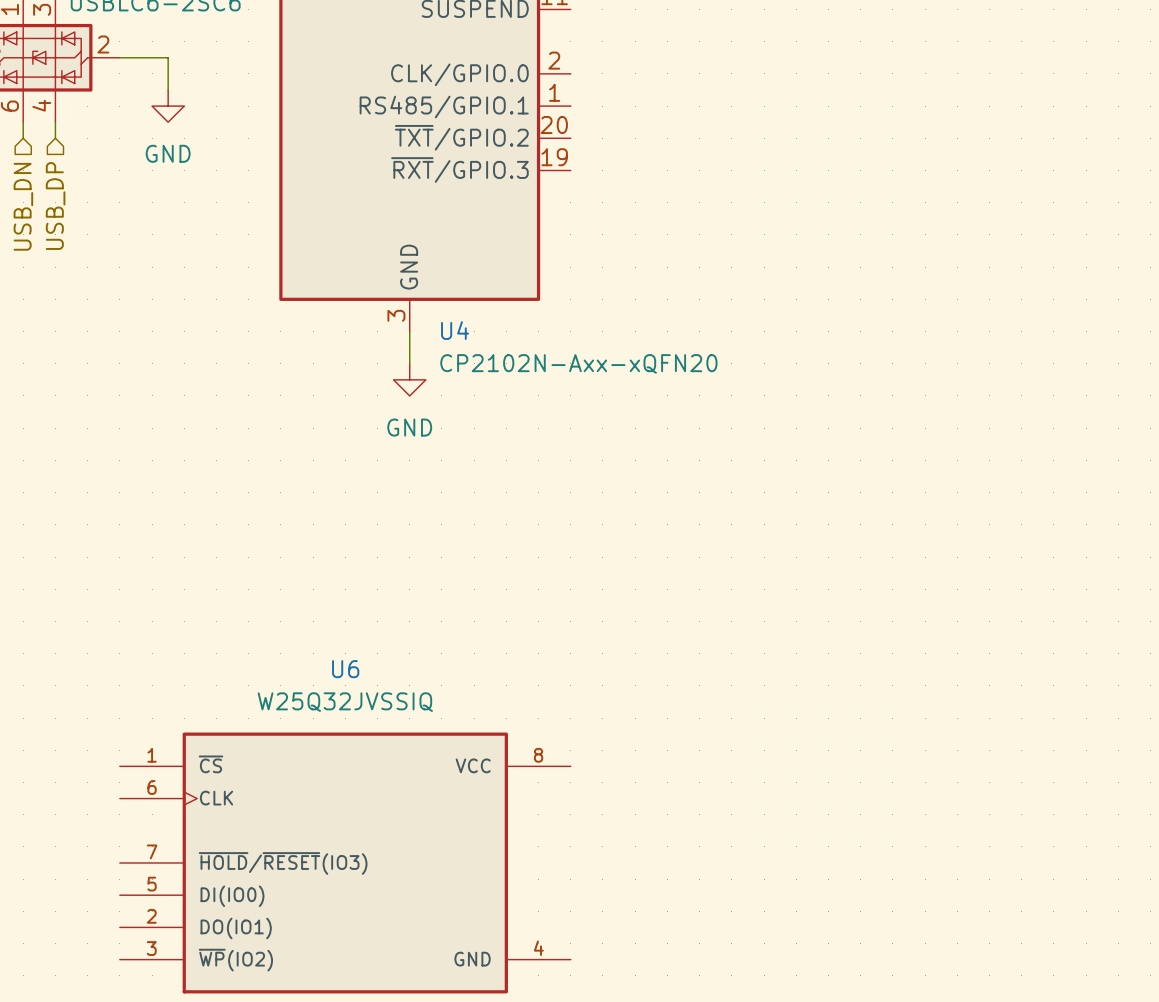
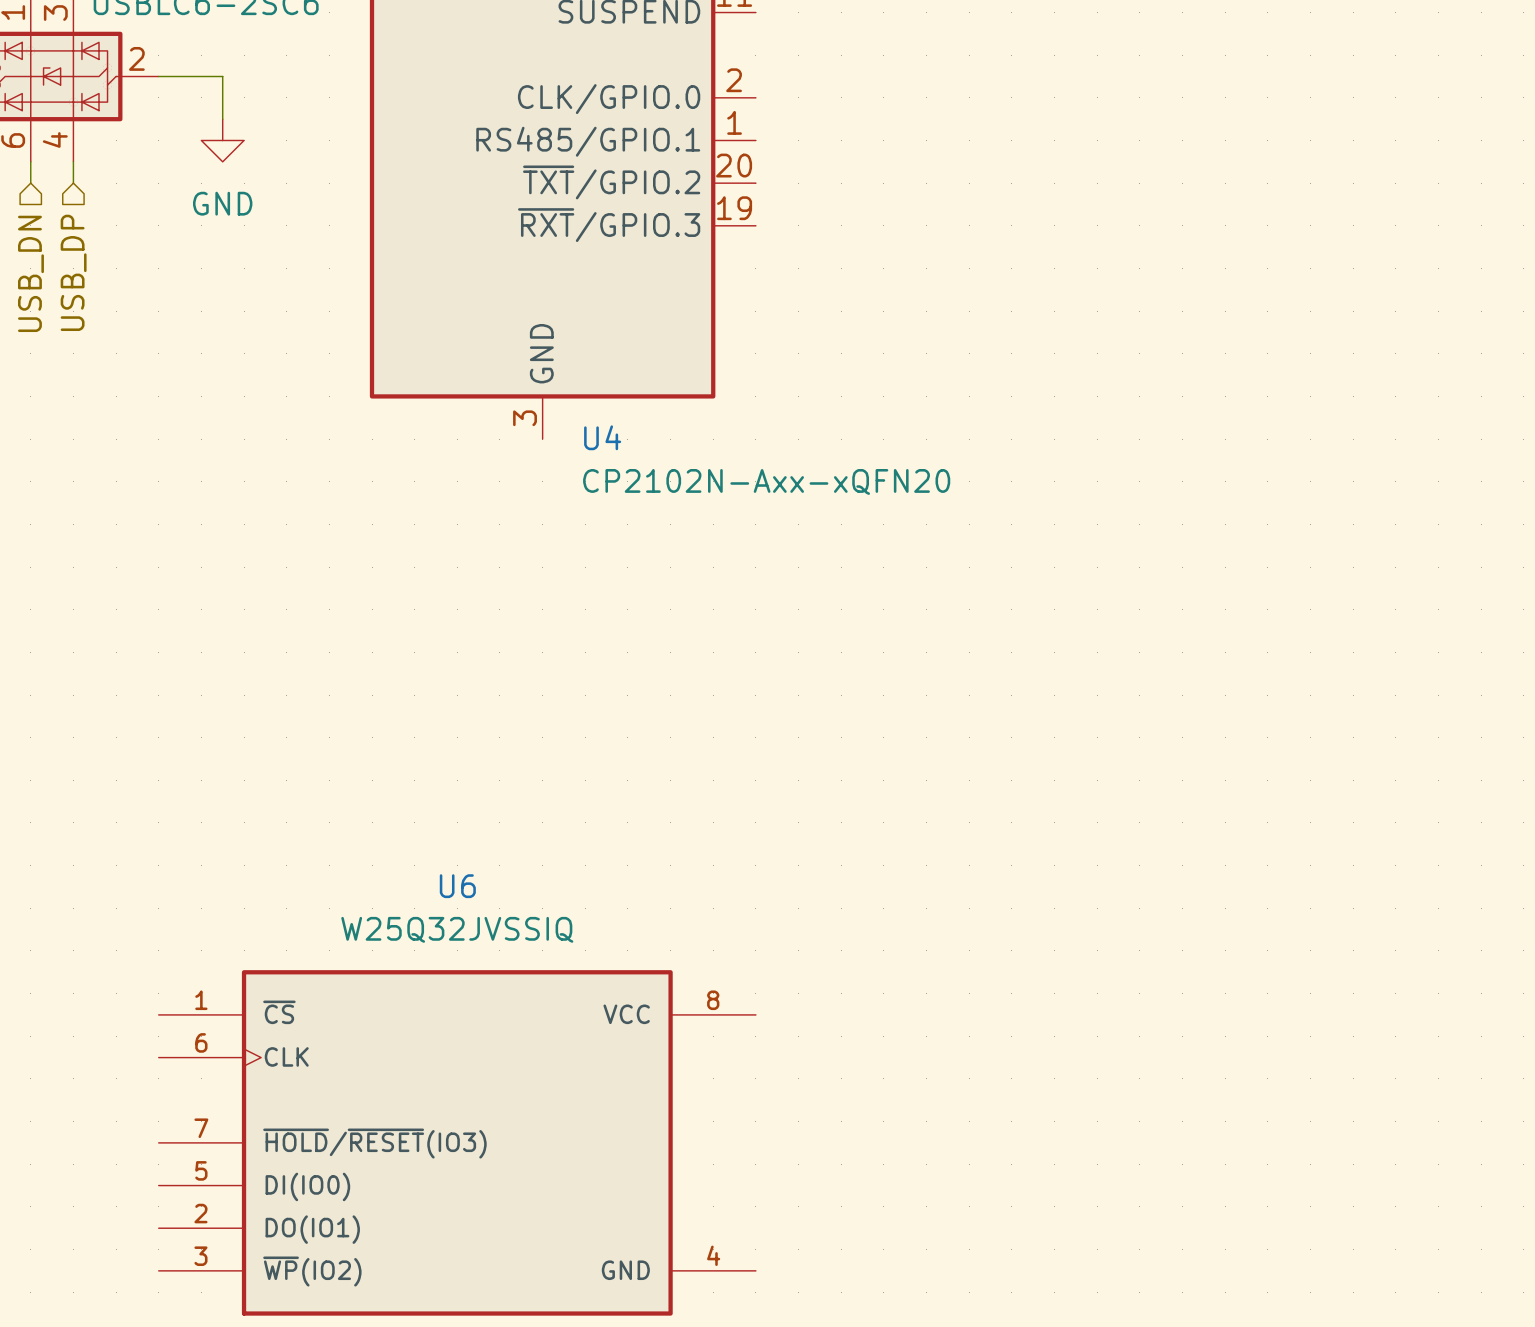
wire: (409, 331) (409, 363) -> none
power symbol: GND (409, 379) -> none

